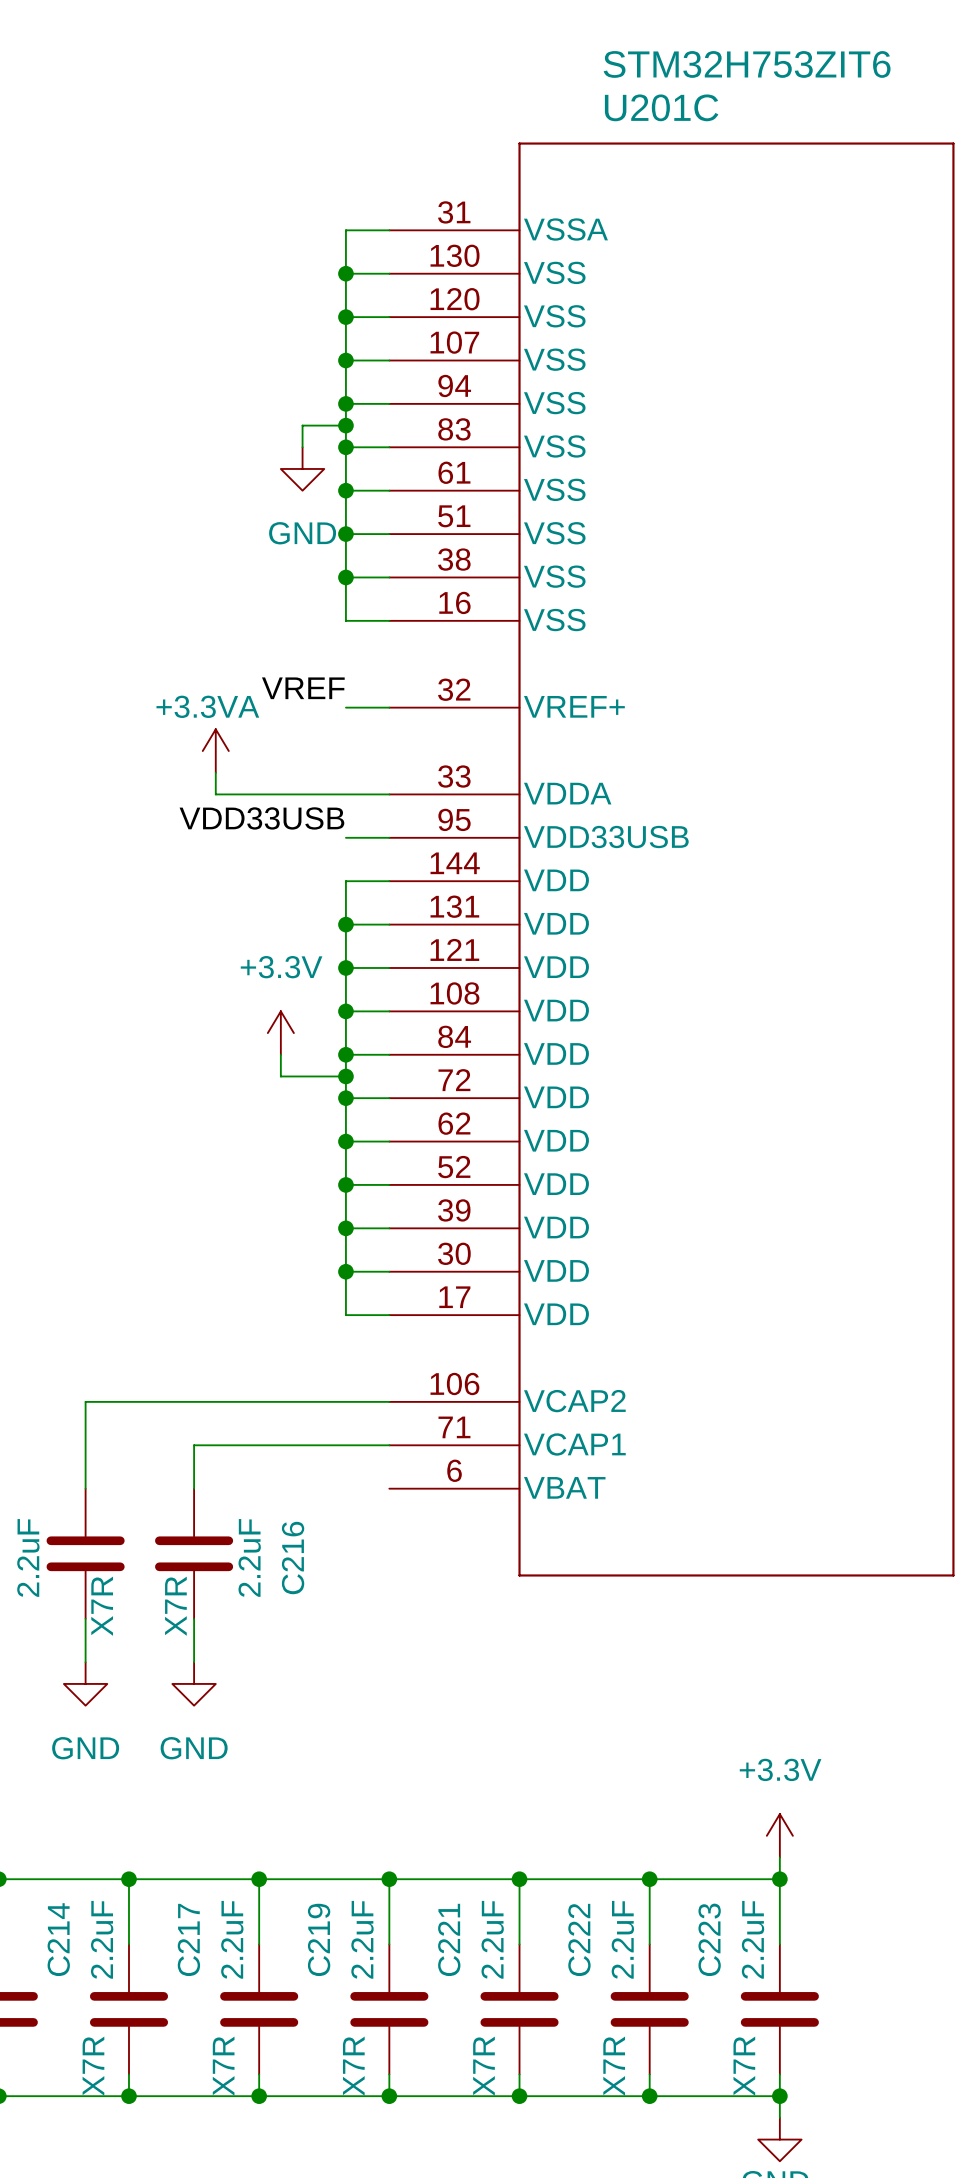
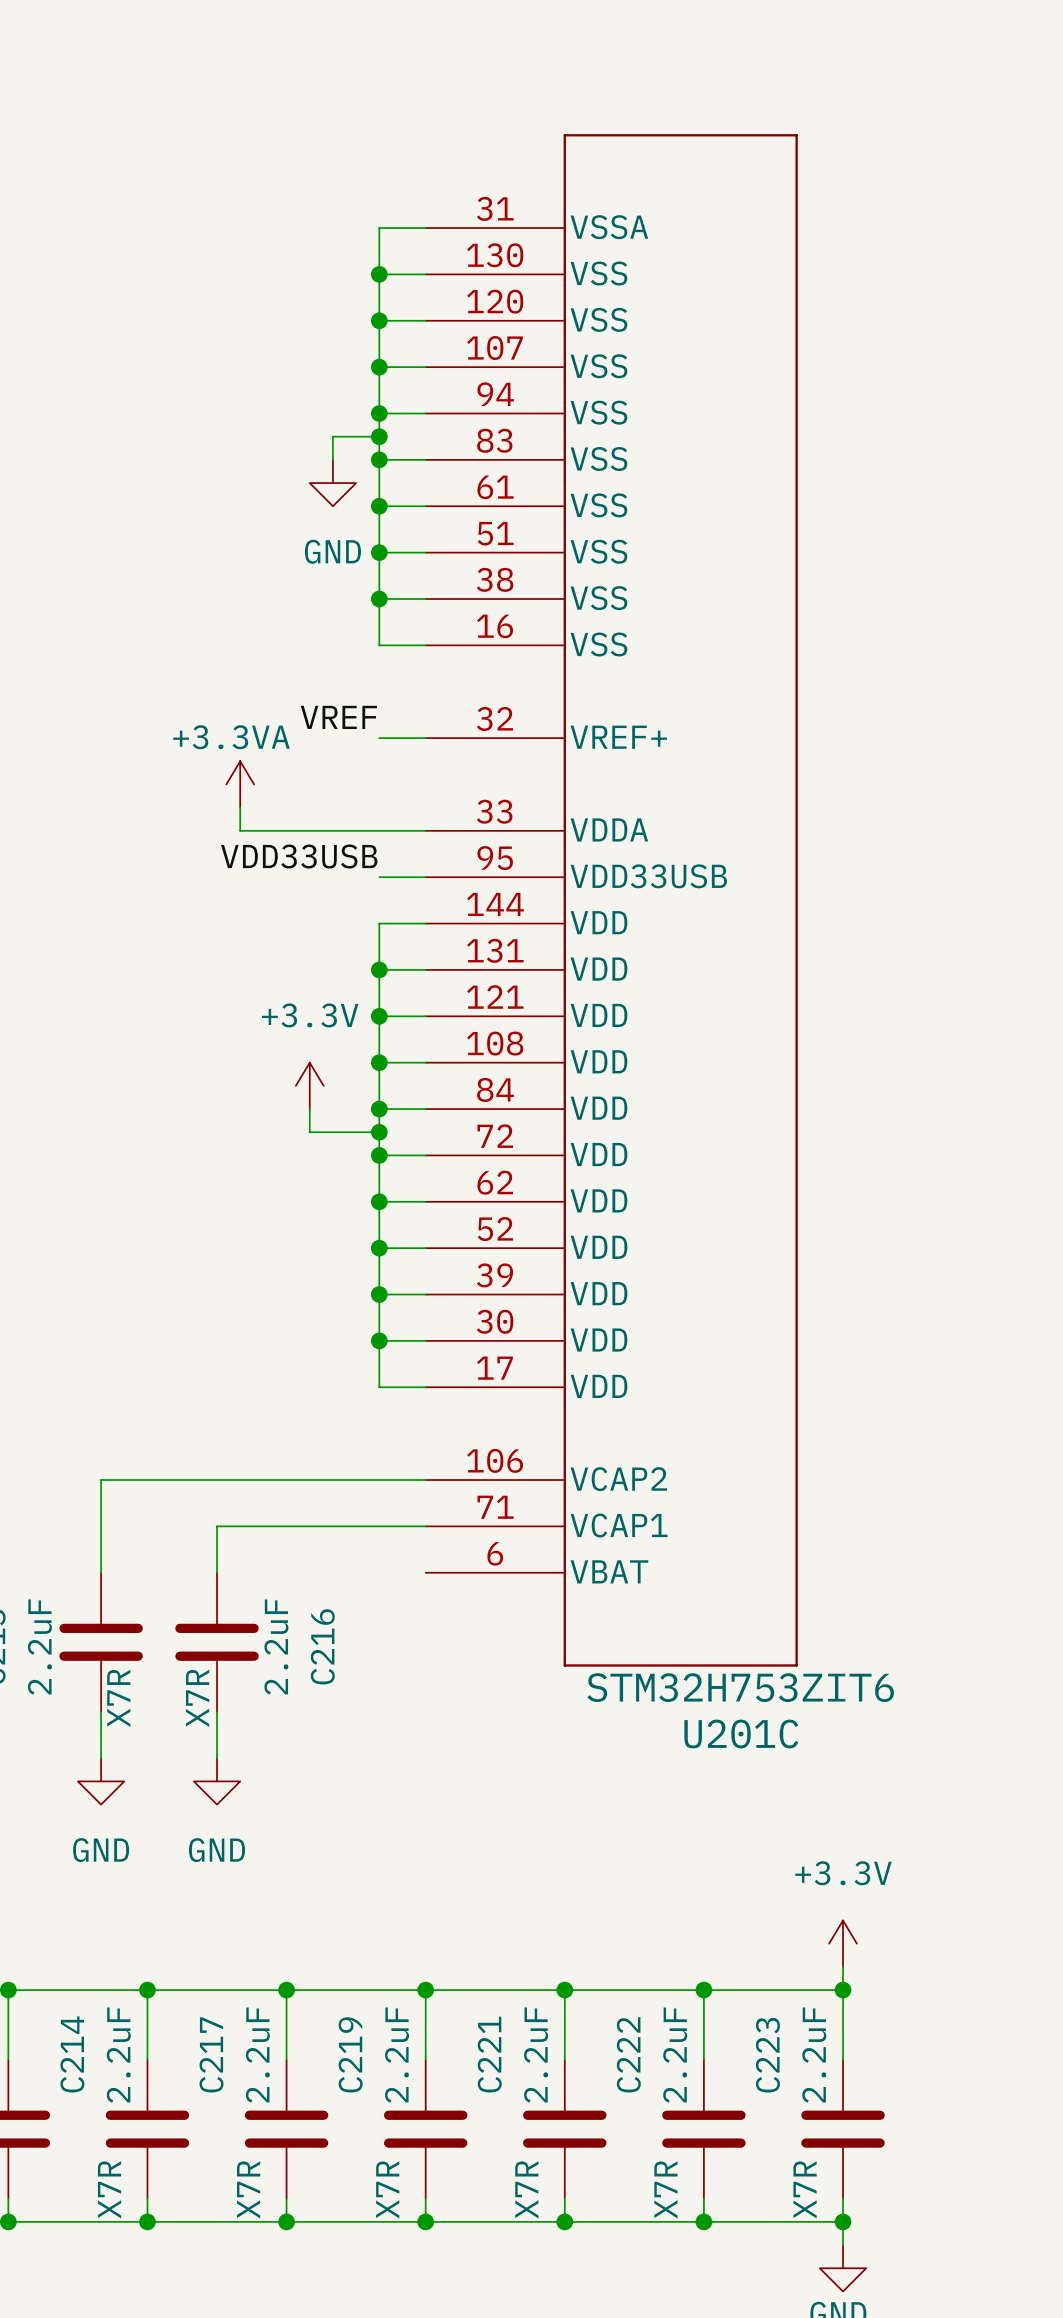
U201C value position: STM32H753ZIT6 (747, 64) -> STM32H753ZIT6 (740, 1687)
U201C name position: U201C (661, 107) -> U201C (741, 1734)
U201C symbol: [389, 142, 955, 1577] -> [425, 134, 798, 1667]

